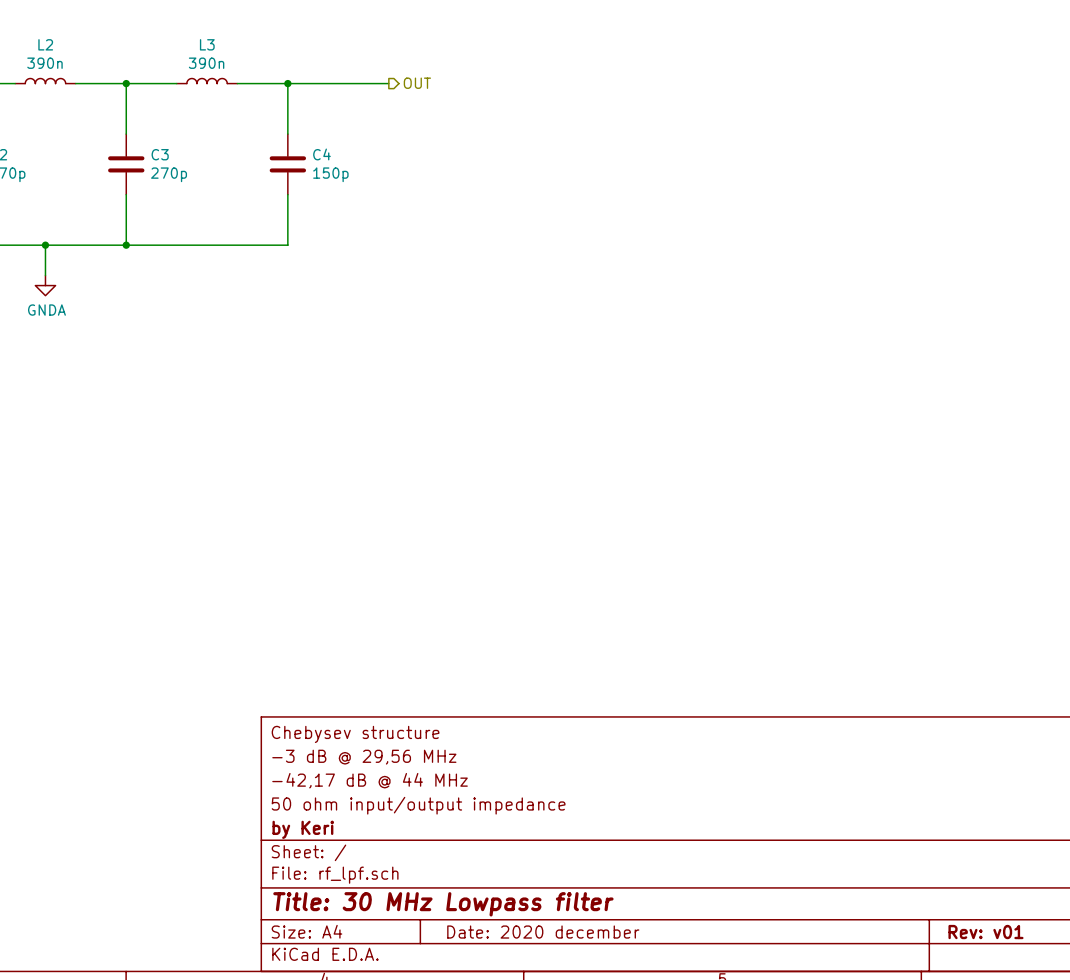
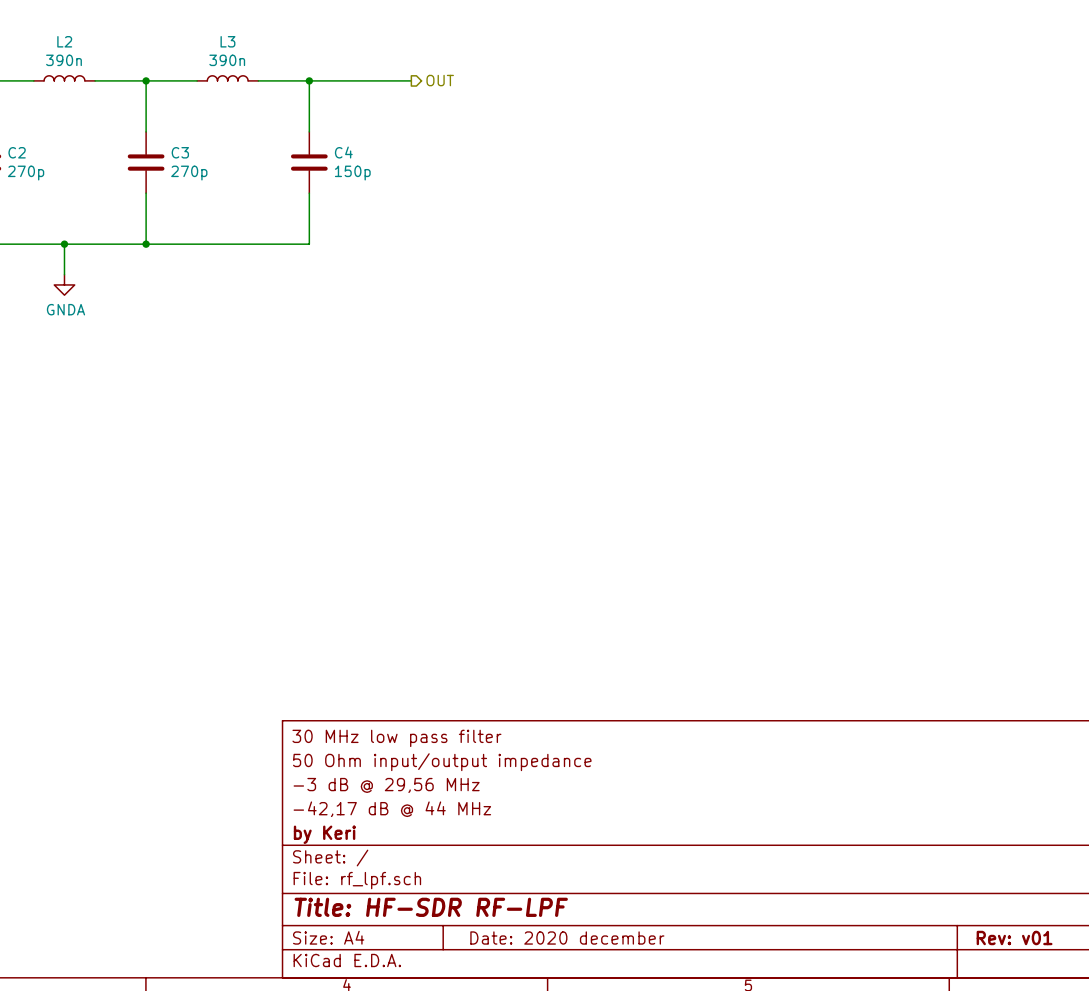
title block: Chebysev structure (355, 734) -> 30 MHz low pass filter (396, 738)
title block: -3 dB @ 29,56 MHz (364, 757) -> 50 Ohm input/output impedance (442, 762)
title block: -42,17 dB @ 44 MHz (370, 780) -> -3 dB @ 29,56 MHz (386, 785)
title block: 50 ohm input/output impedance (418, 805) -> -42,17 dB @ 44 MHz (392, 809)
title block: Title: 30 MHz Lowpass filter (443, 904) -> Title: HF-SDR RF-LPF (431, 907)

